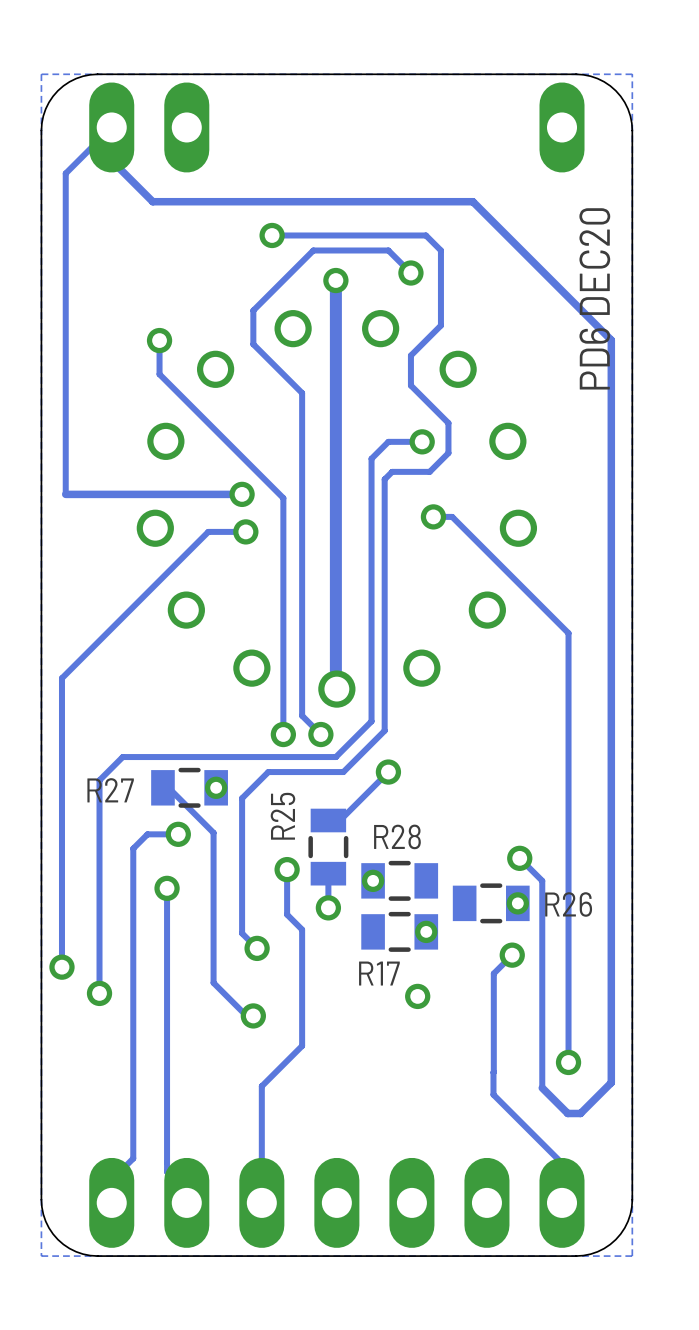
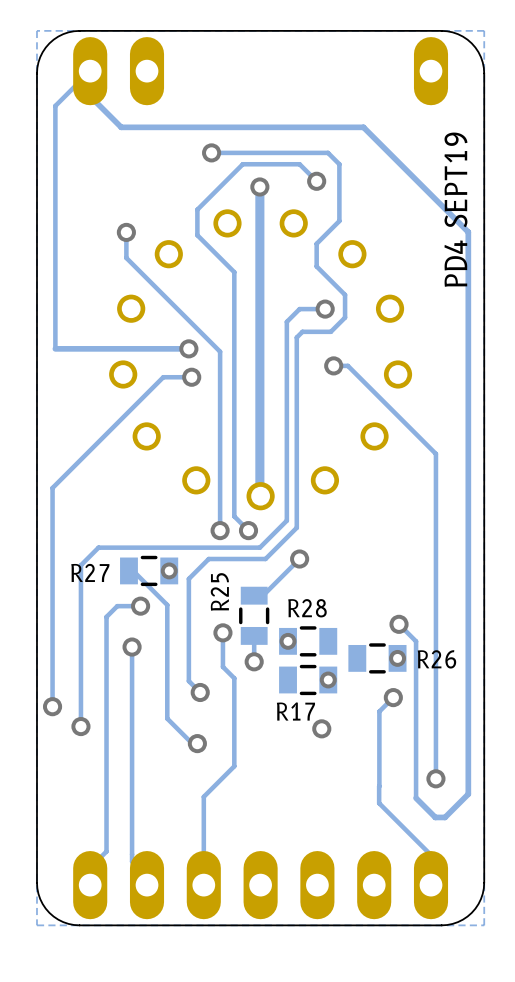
text: PD6 DEC20 (594, 298) -> PD4 SEPT19 (455, 209)

